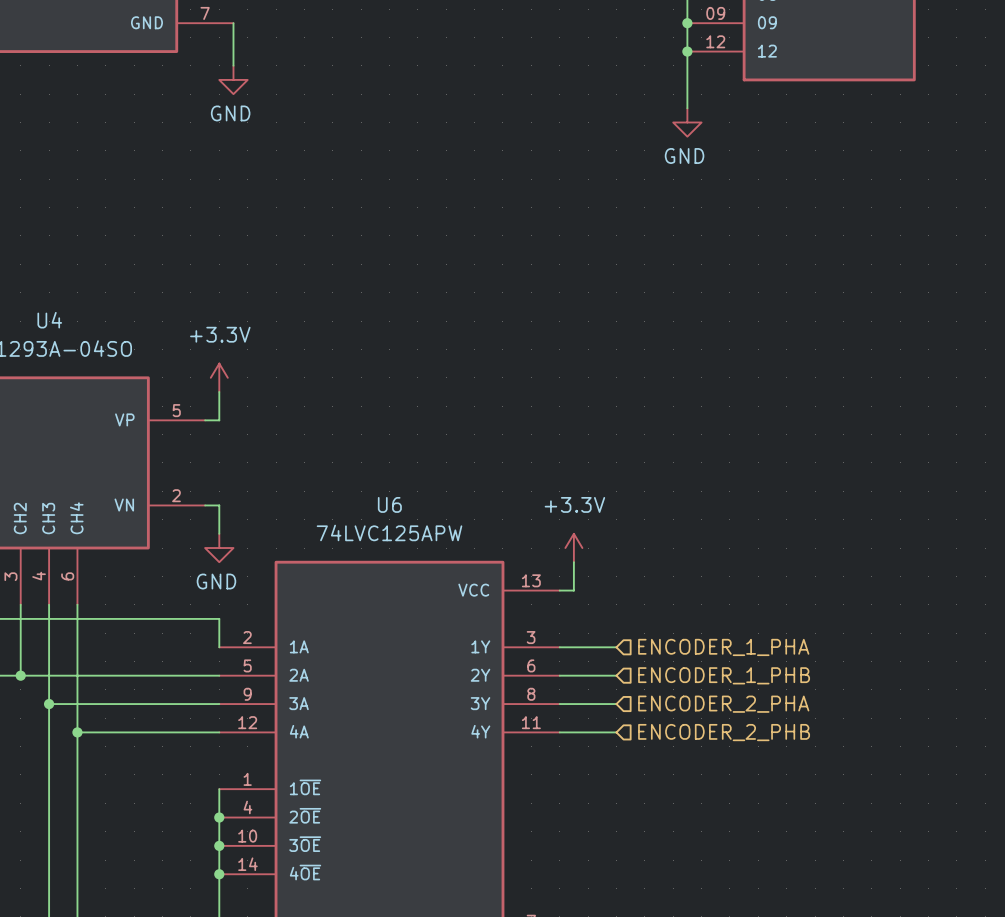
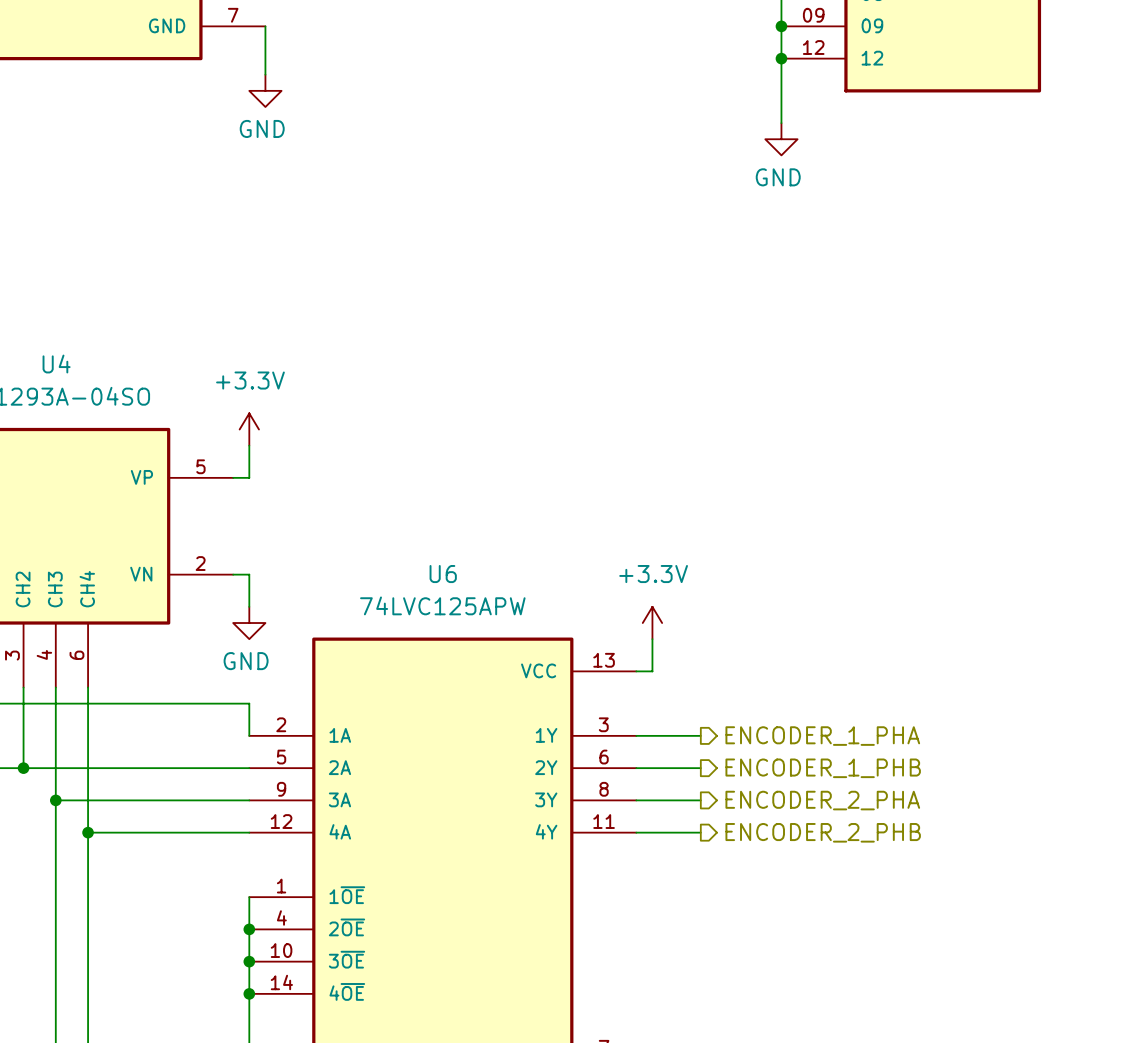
hierarchical label shape: input (723, 647) -> output (822, 736)
hierarchical label shape: input (724, 675) -> output (823, 768)
hierarchical label shape: input (723, 704) -> output (822, 800)
hierarchical label shape: input (724, 732) -> output (823, 832)

